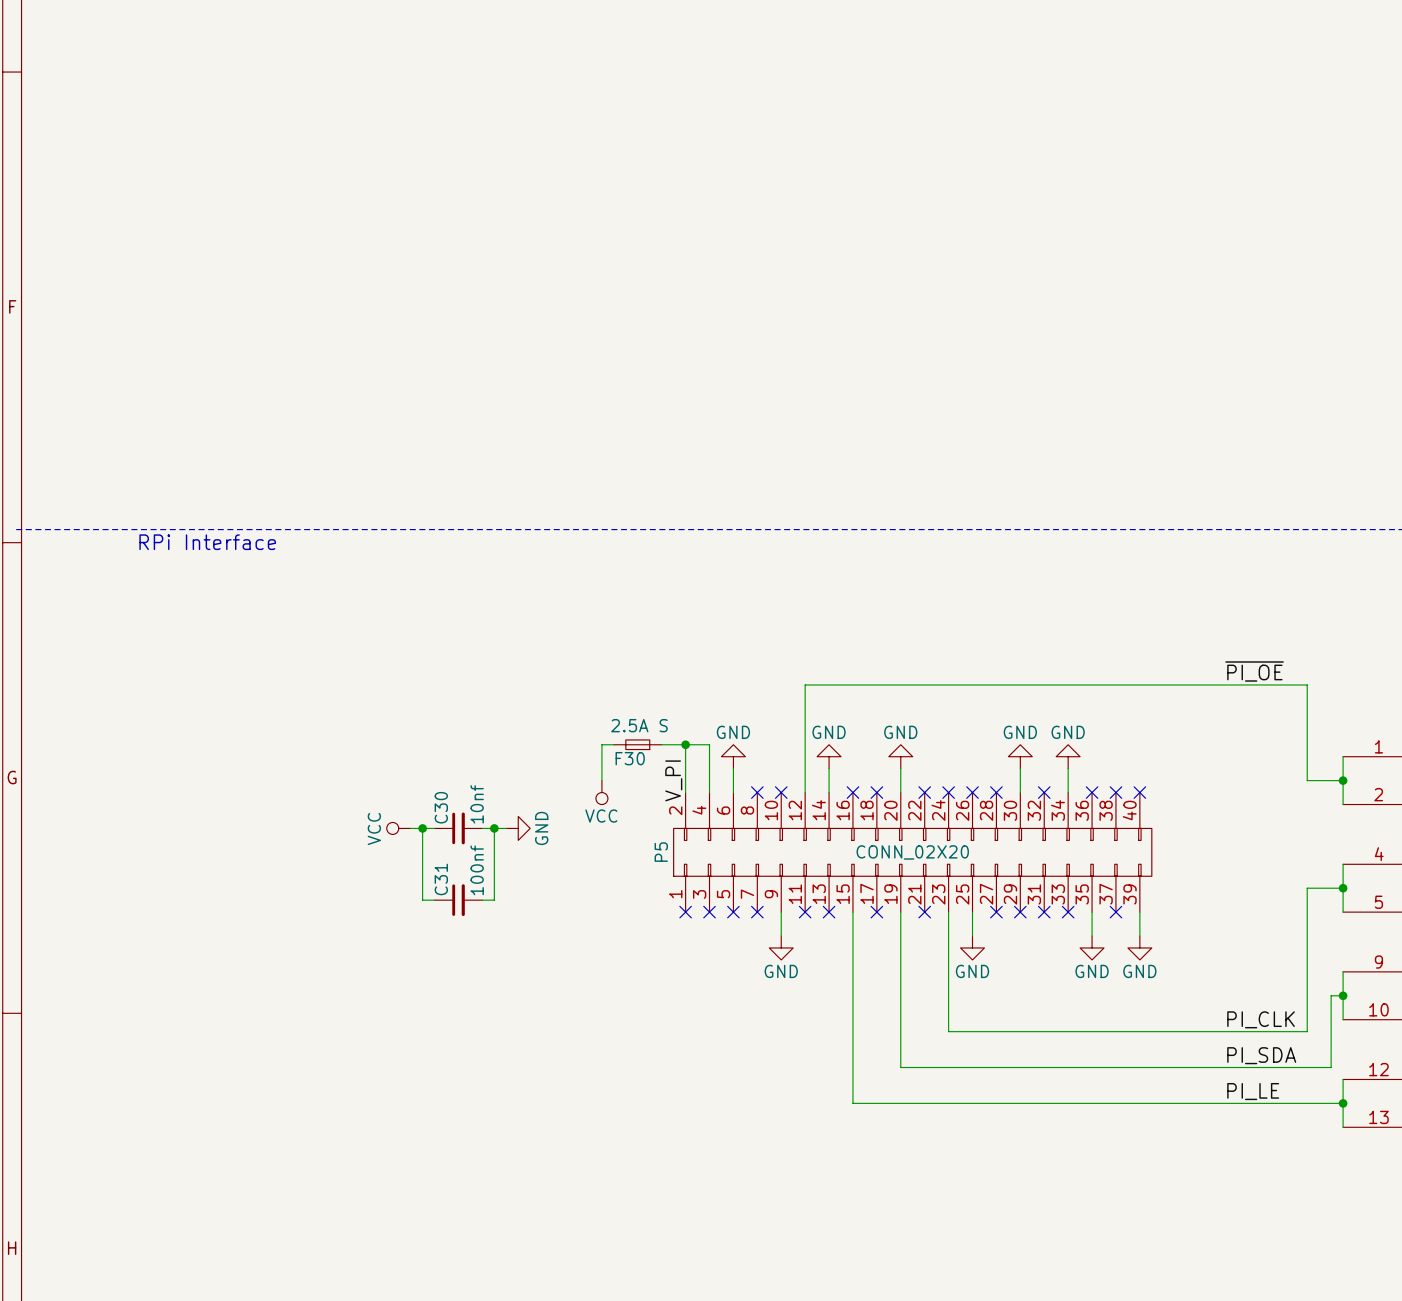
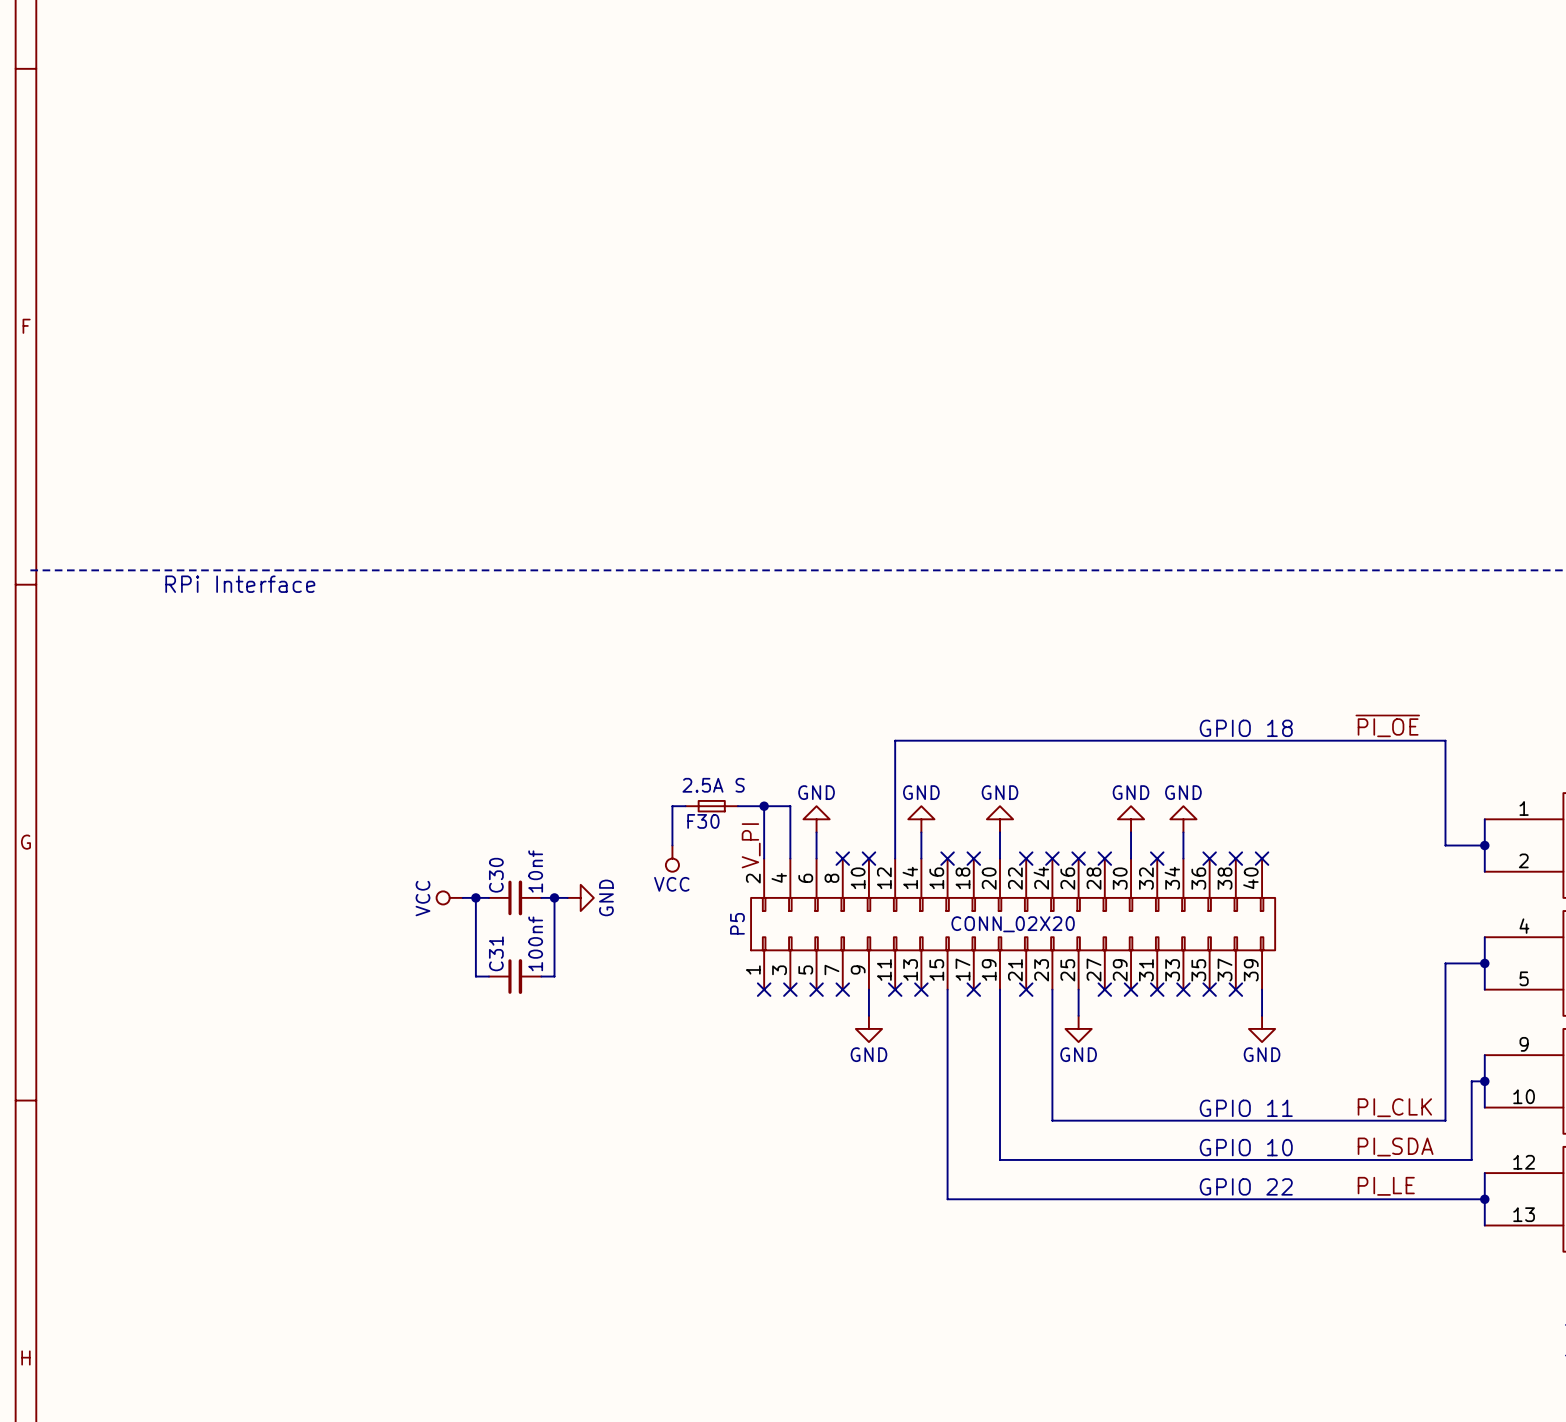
text: none -> GPIO 18 (1246, 728)
wire: (1092, 912) (1092, 936) -> none
no-connect mark: none -> (1209, 989)
power symbol: GND (1092, 947) -> none
text: none -> GPIO 11 (1246, 1108)
text: none -> GPIO 10 (1246, 1147)
text: none -> GPIO 22 (1246, 1186)

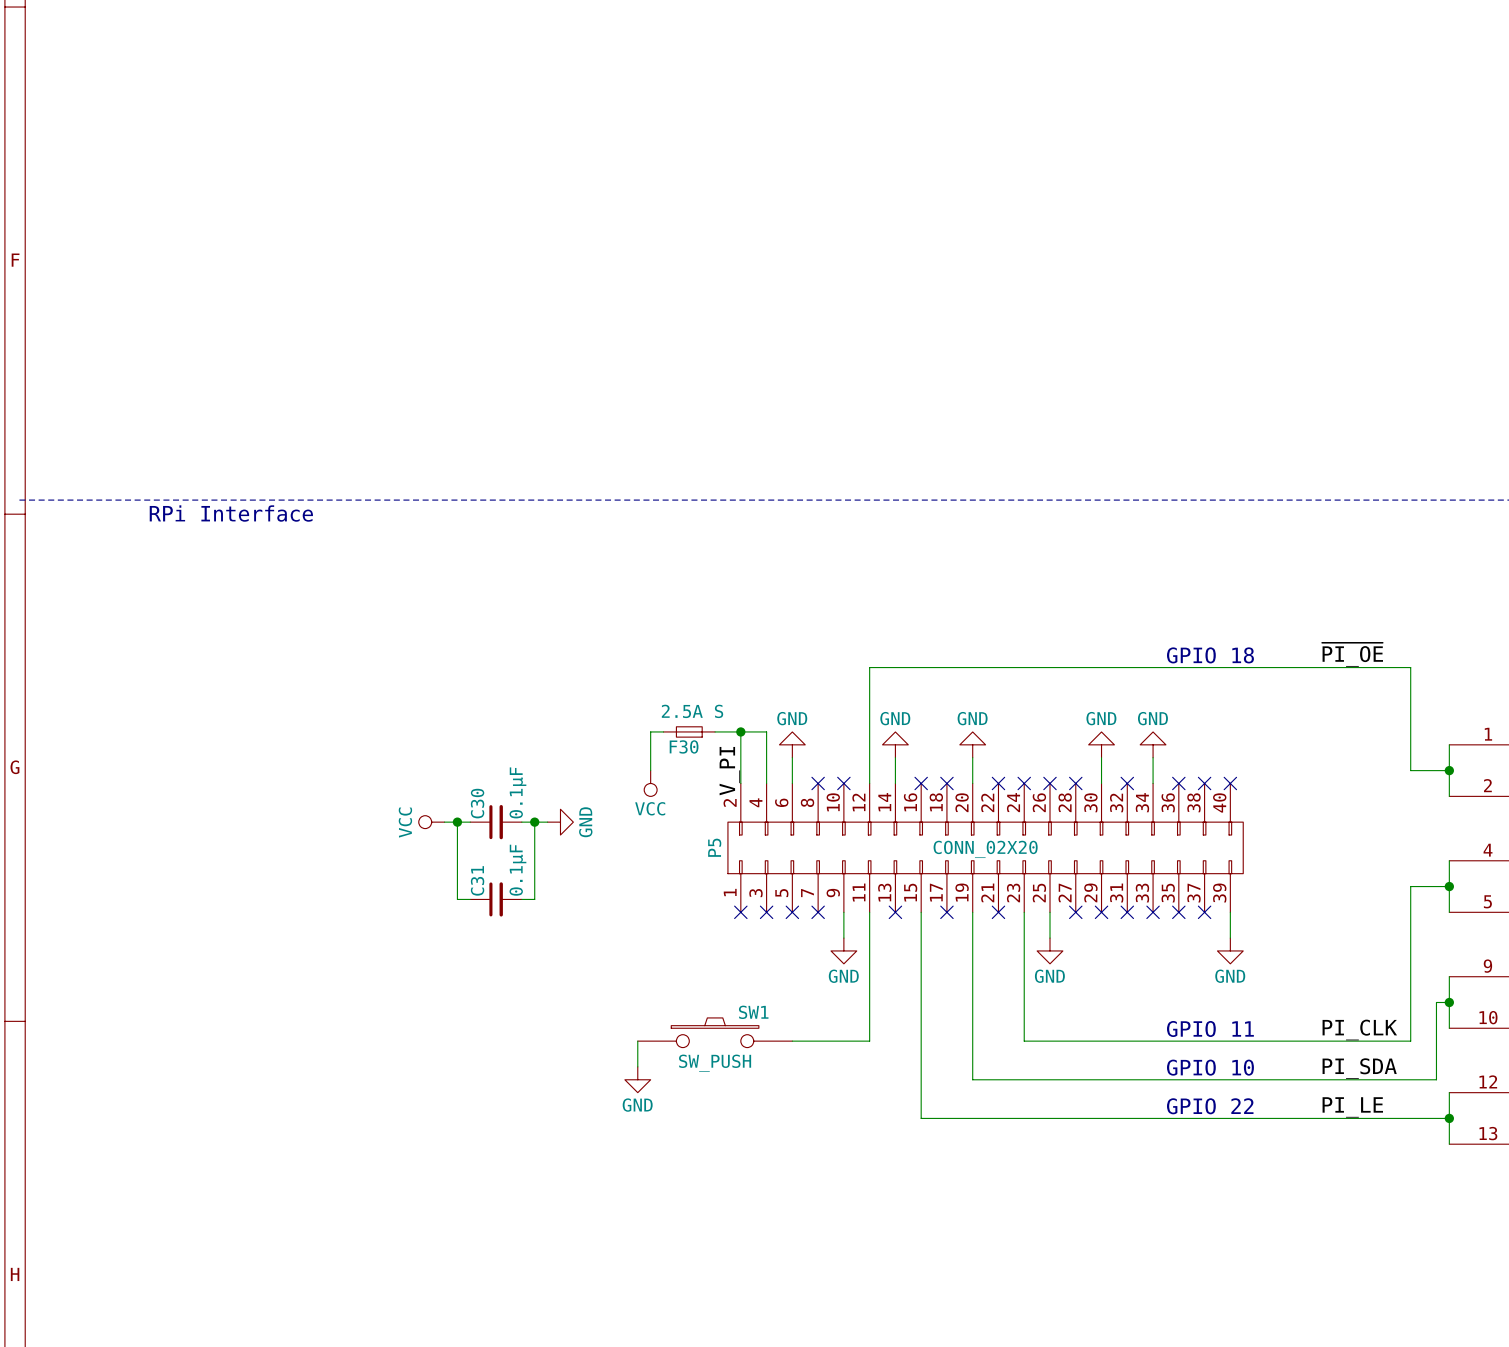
C30 value: 10nf (535, 871) -> 0.1μF (517, 792)
C31 value: 100nf (535, 943) -> 0.1μF (517, 870)
wire: none -> (869, 912) (869, 1041) (792, 1041)
no-connect mark: (895, 989) -> none
SW1: none -> SW_PUSH (715, 1032)
wire: none -> (637, 1041) (637, 1066)
power symbol: none -> GND (637, 1079)

